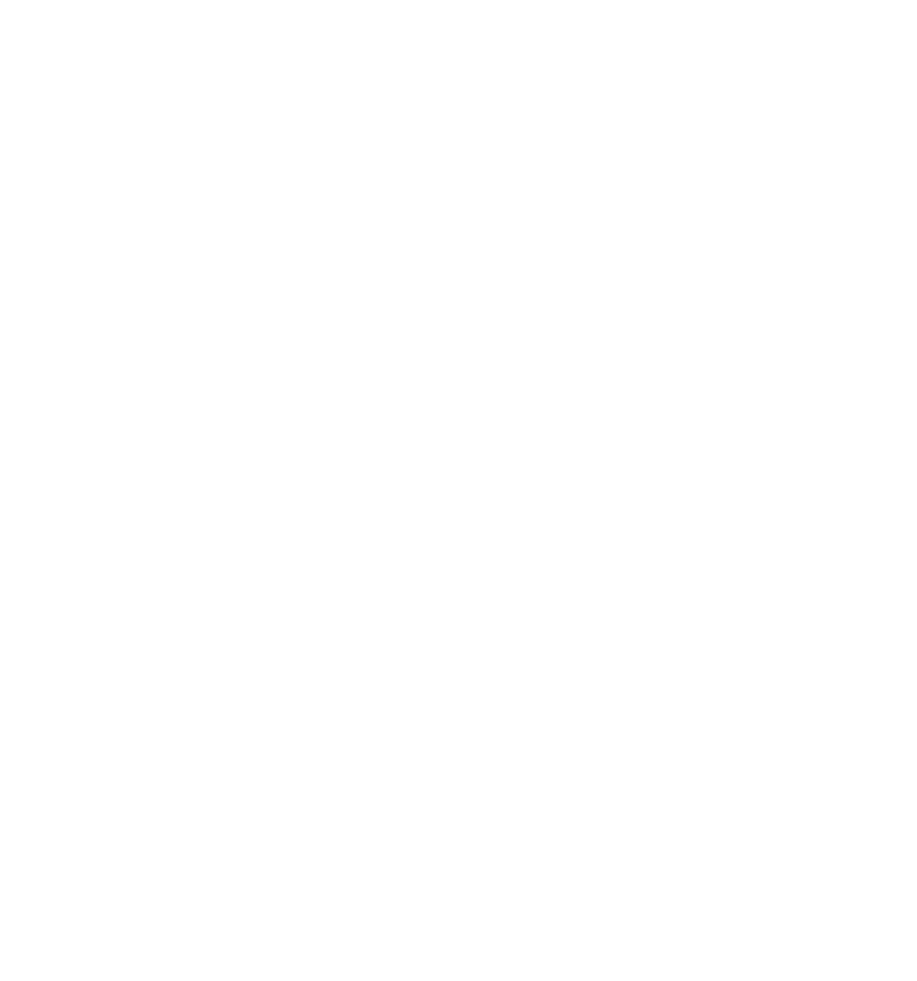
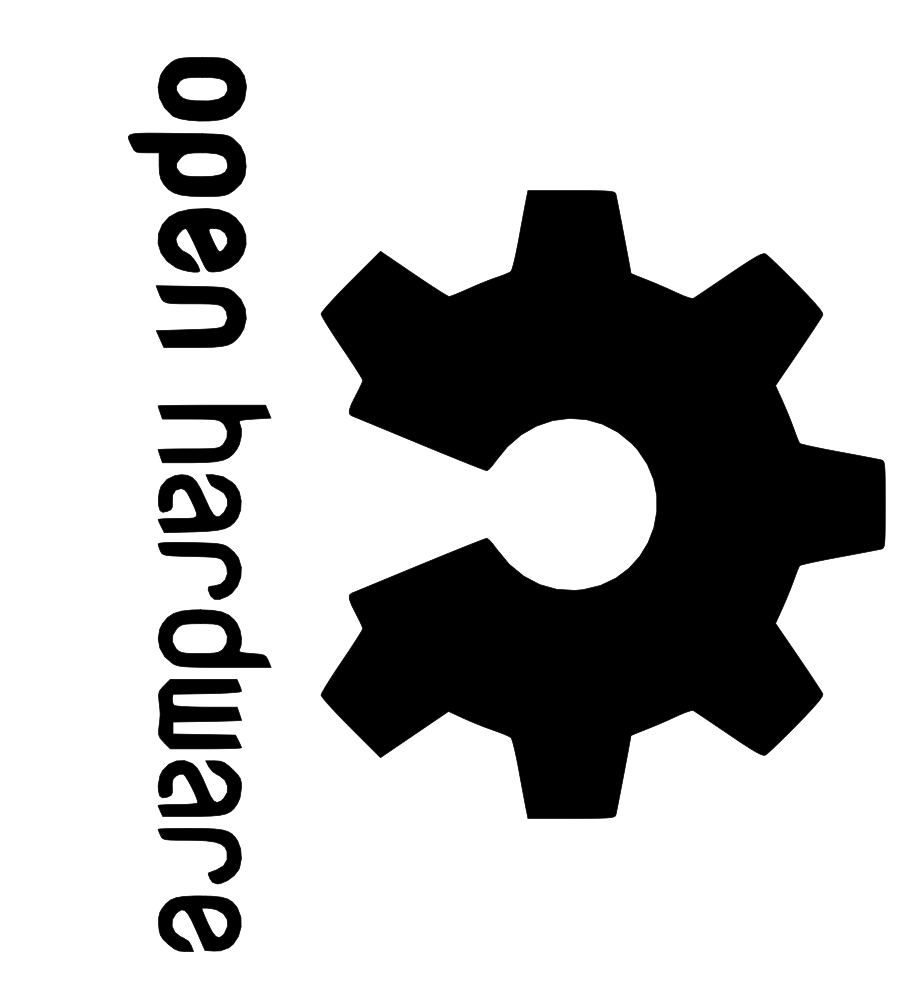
drawing: none -> [128, 57, 886, 952]

